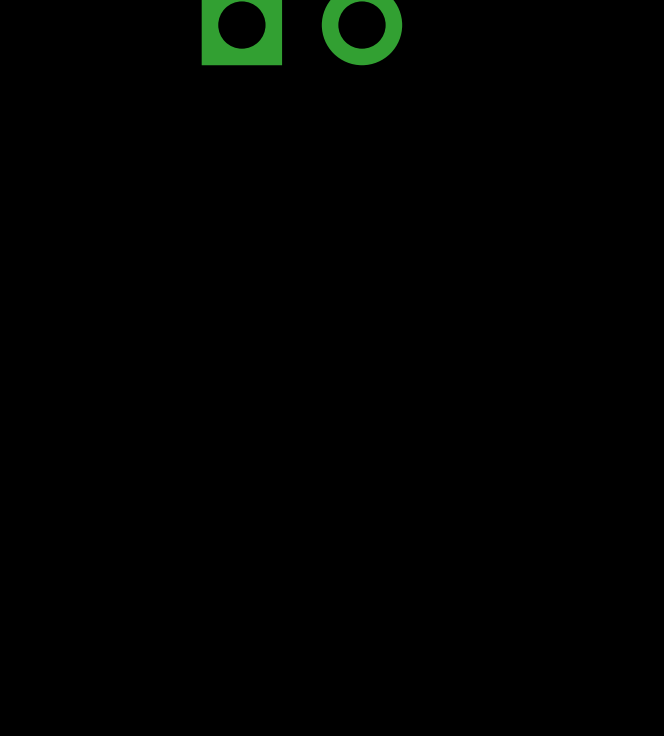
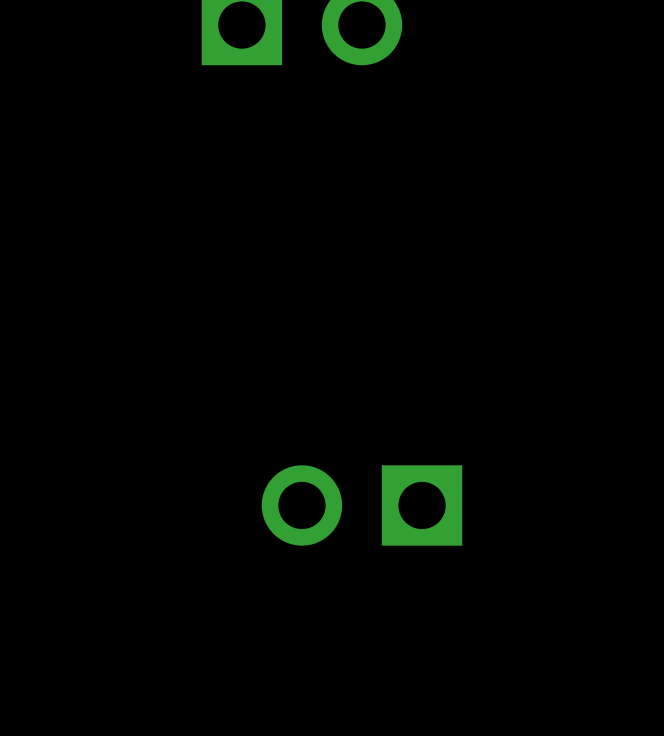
part: none -> (361, 505)

